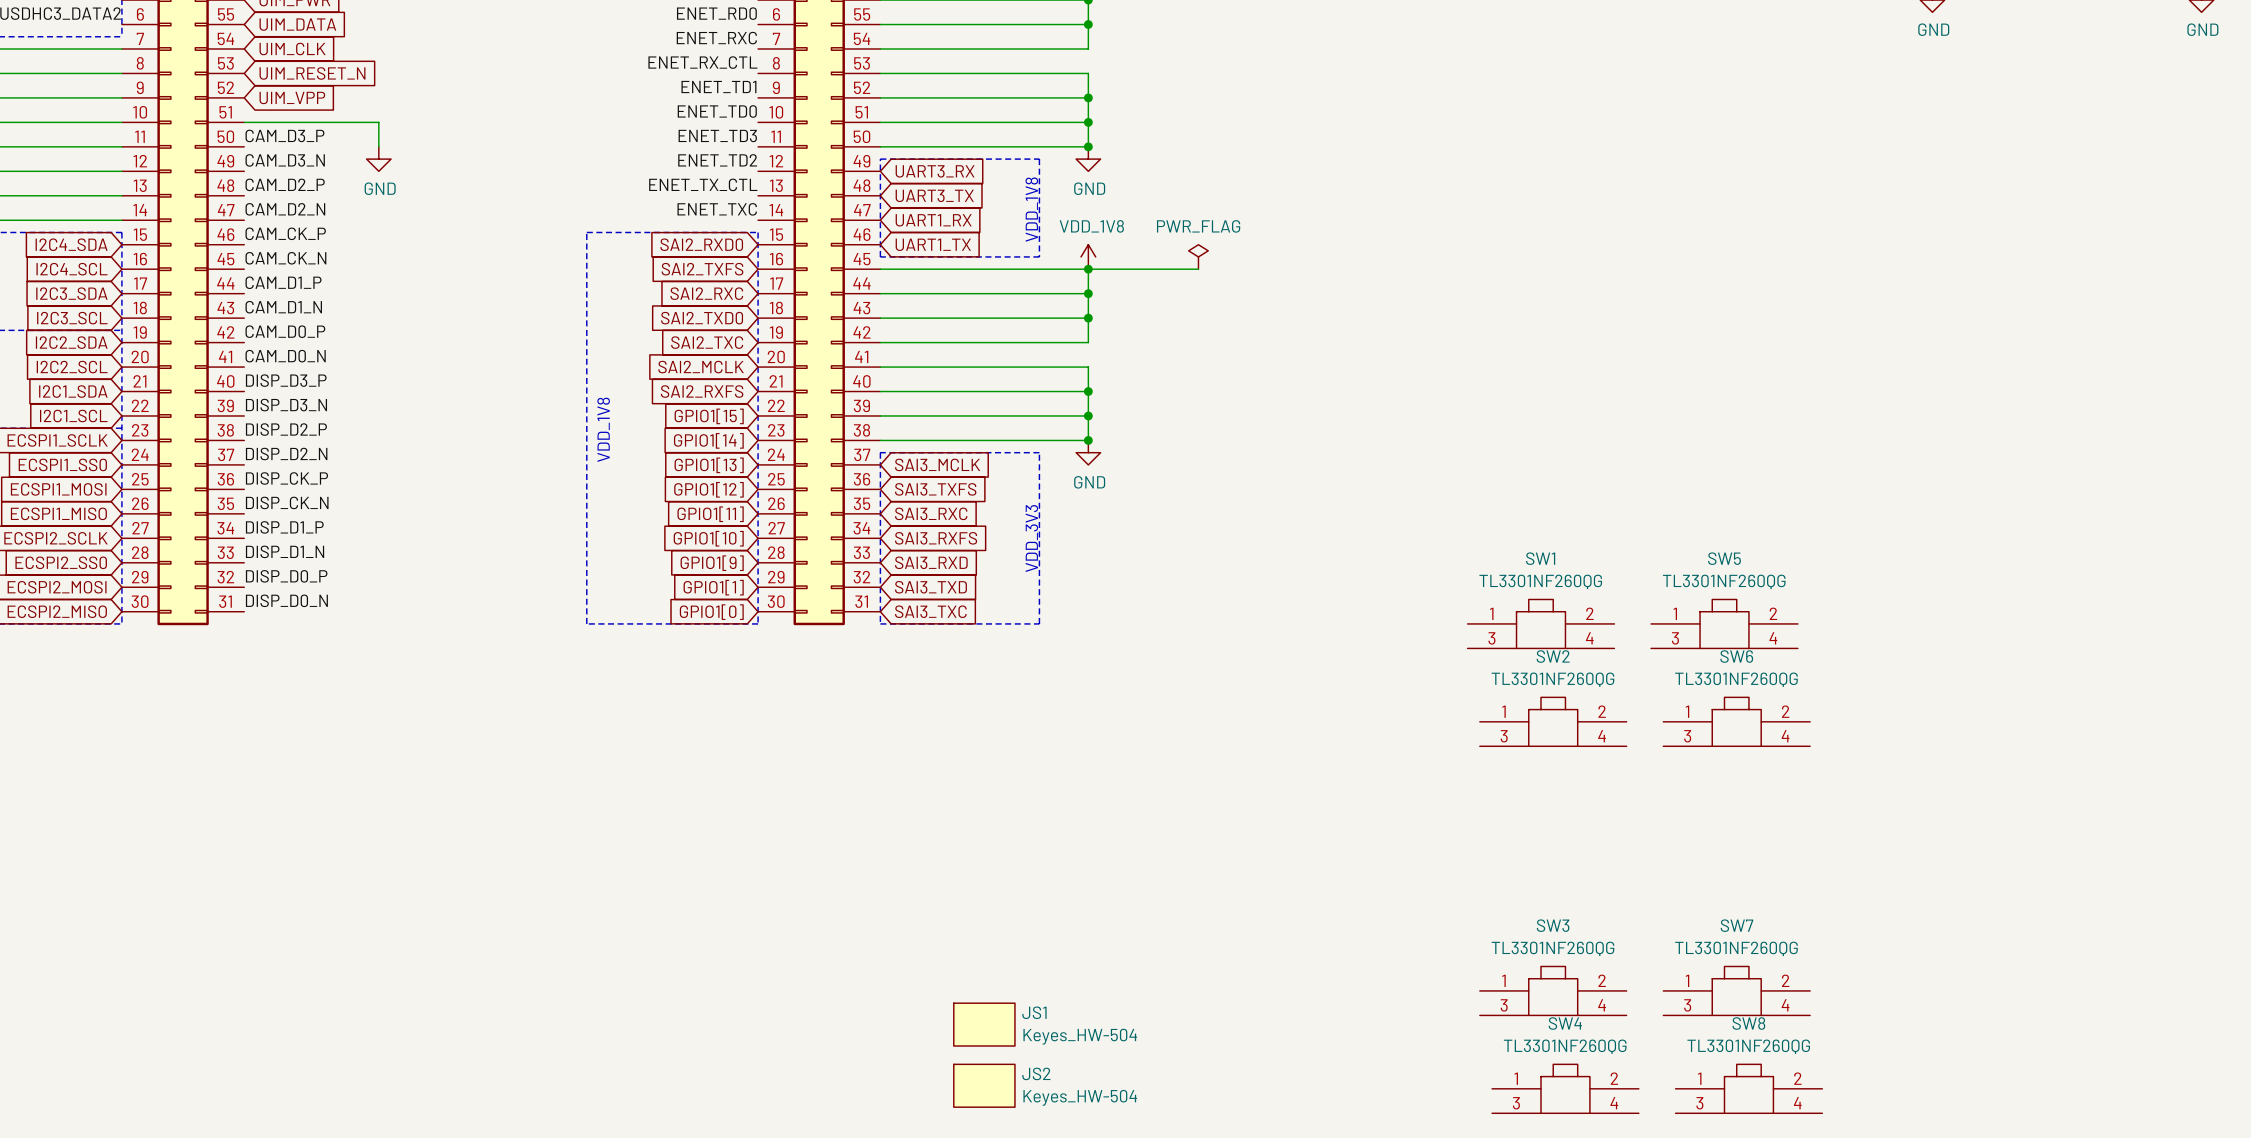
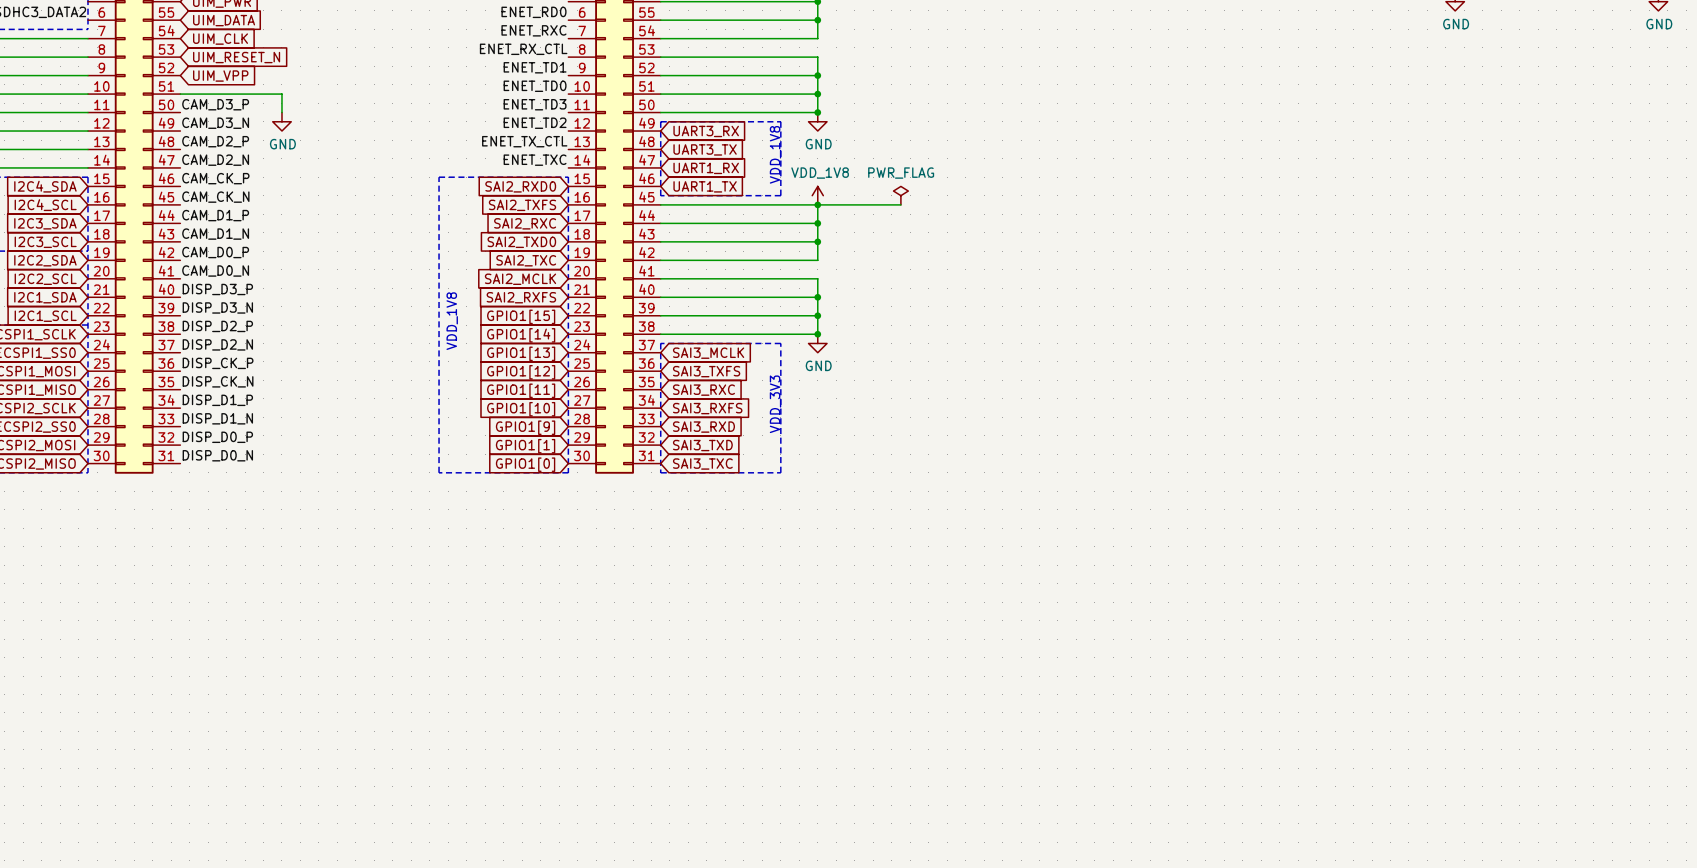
SW1: TL3301NF260QG (1540, 623) -> none
SW5: TL3301NF260QG (1724, 623) -> none
SW2: TL3301NF260QG (1553, 721) -> none
SW6: TL3301NF260QG (1736, 721) -> none
SW3: TL3301NF260QG (1553, 990) -> none
SW7: TL3301NF260QG (1736, 990) -> none
JS1: Keyes_HW-504 (984, 1024) -> none
JS2: Keyes_HW-504 (984, 1085) -> none
SW4: TL3301NF260QG (1565, 1088) -> none
SW8: TL3301NF260QG (1748, 1088) -> none

